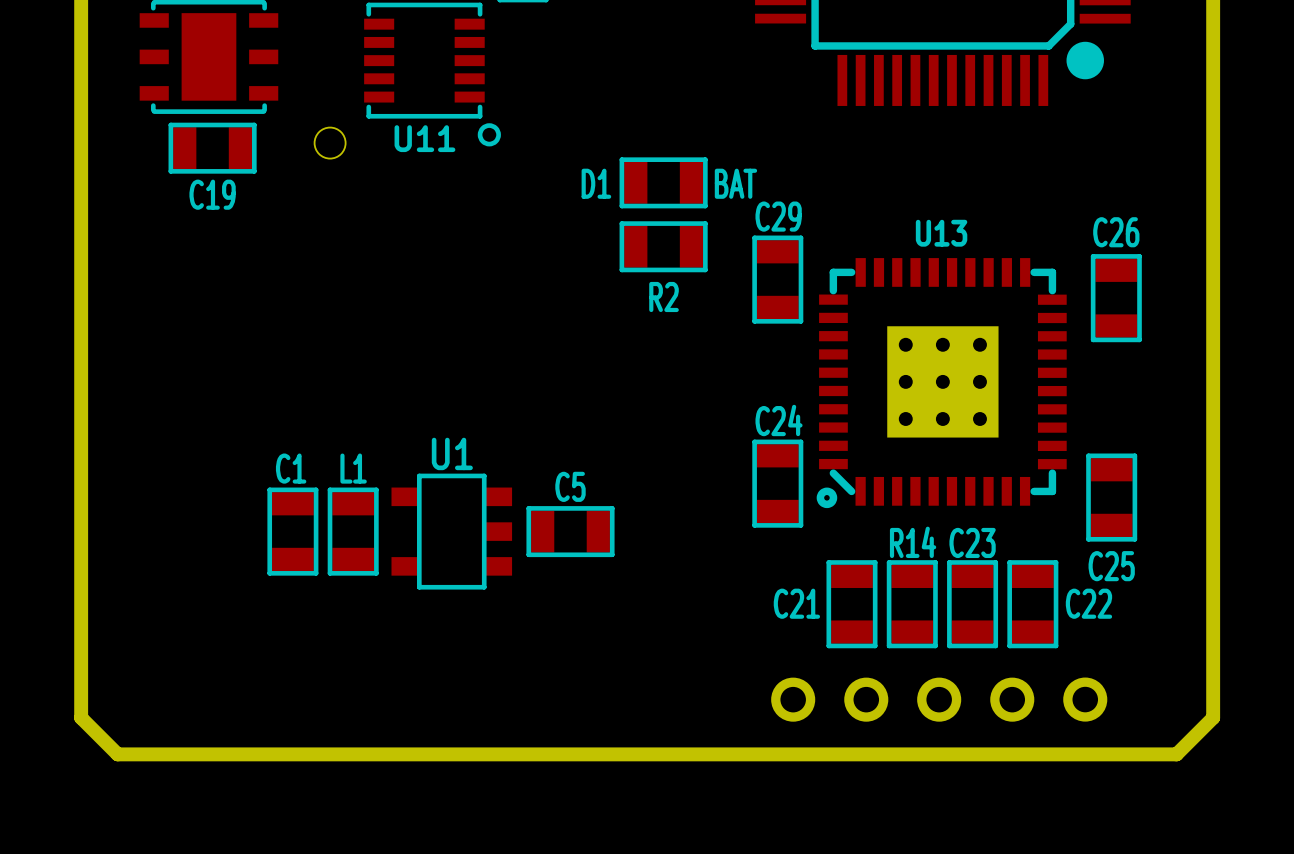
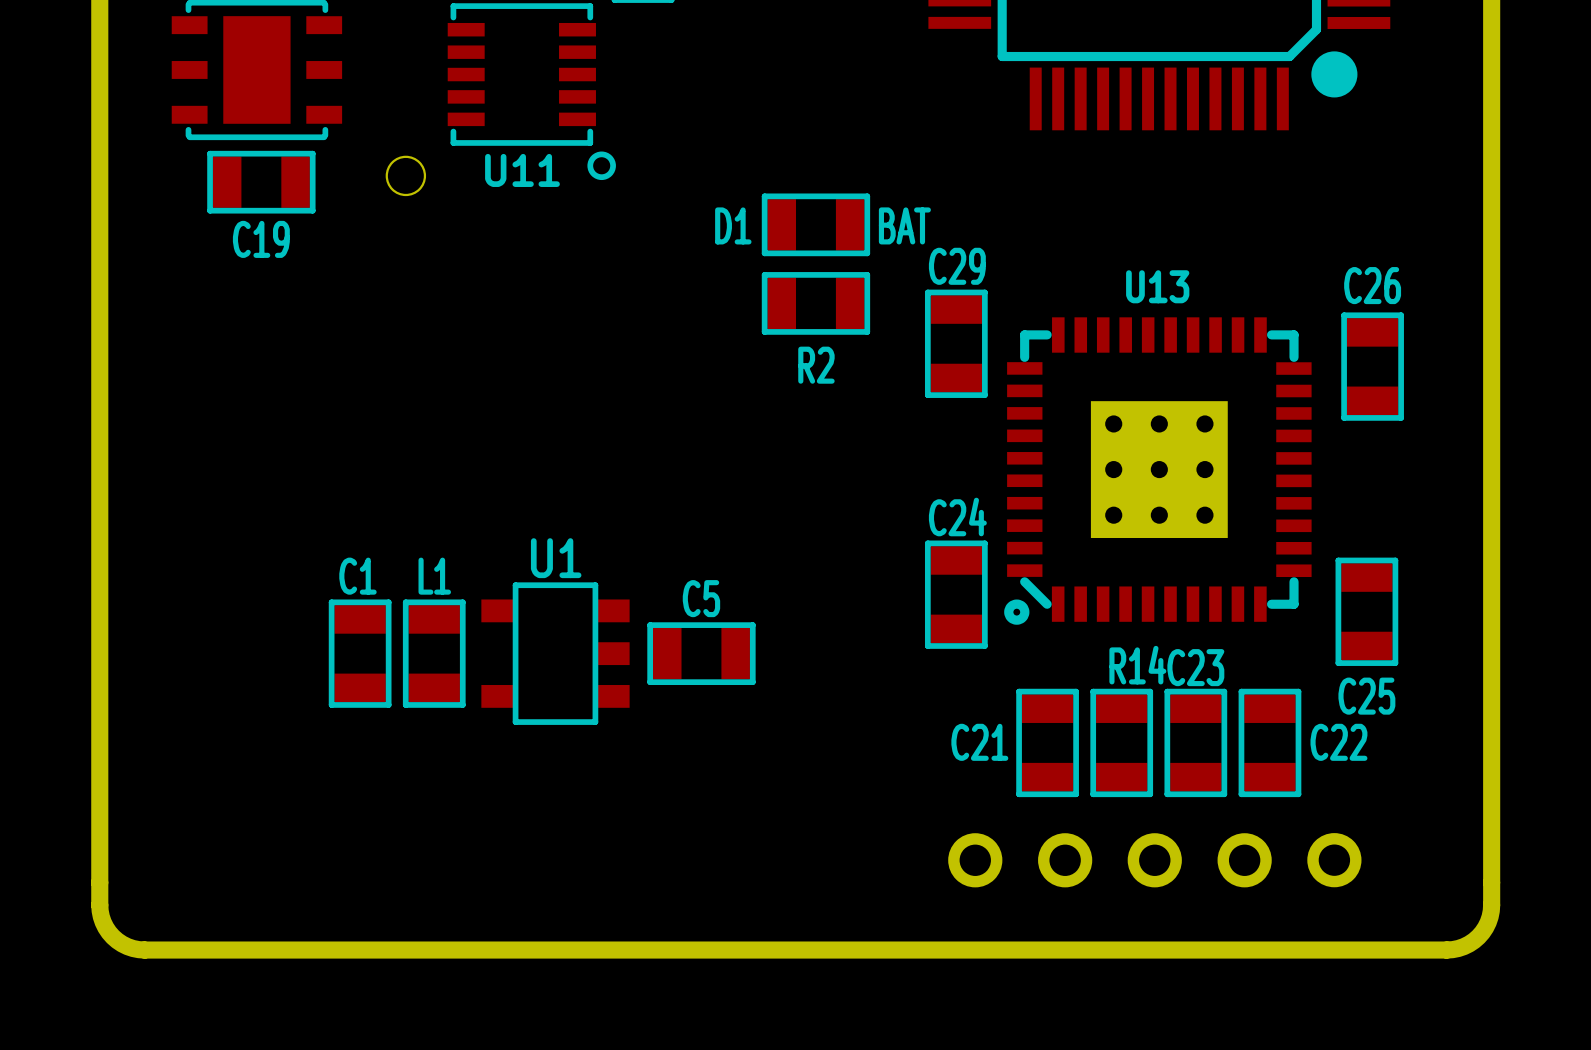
R14 name position: R14 (913, 542) -> R14 (1137, 665)
board edge: (81, 717) (117, 754) (1176, 754) (1213, 717) -> (99, 882) (100, 910) (105, 927) (112, 936) (122, 944) (133, 948) (144, 950) (1446, 950) (1458, 948) (1469, 944) (1478, 936) (1485, 927) (1491, 910) (1491, 882)

